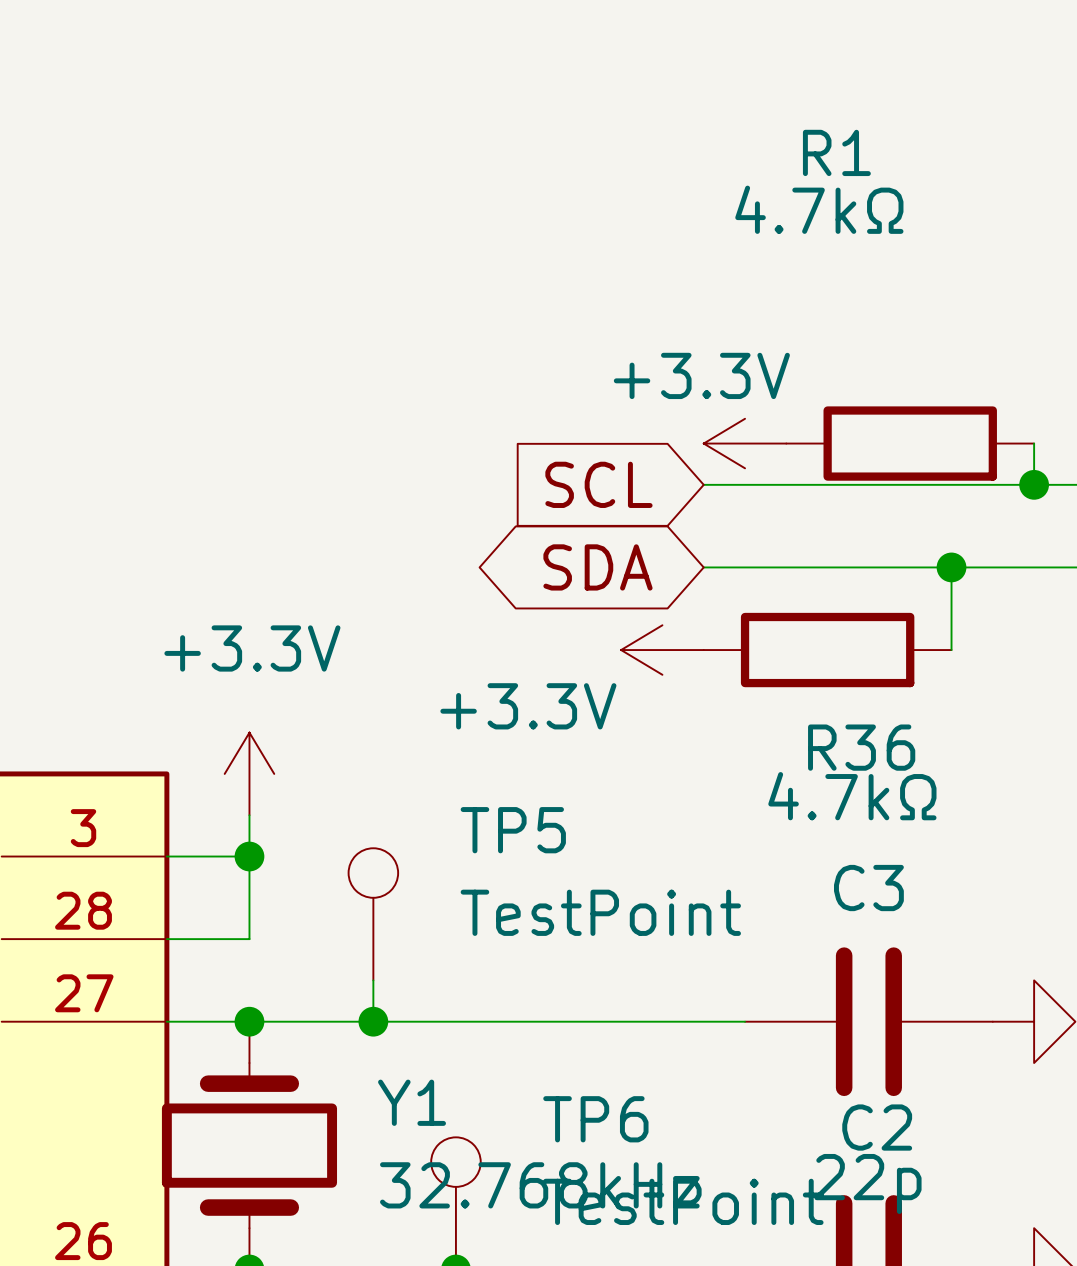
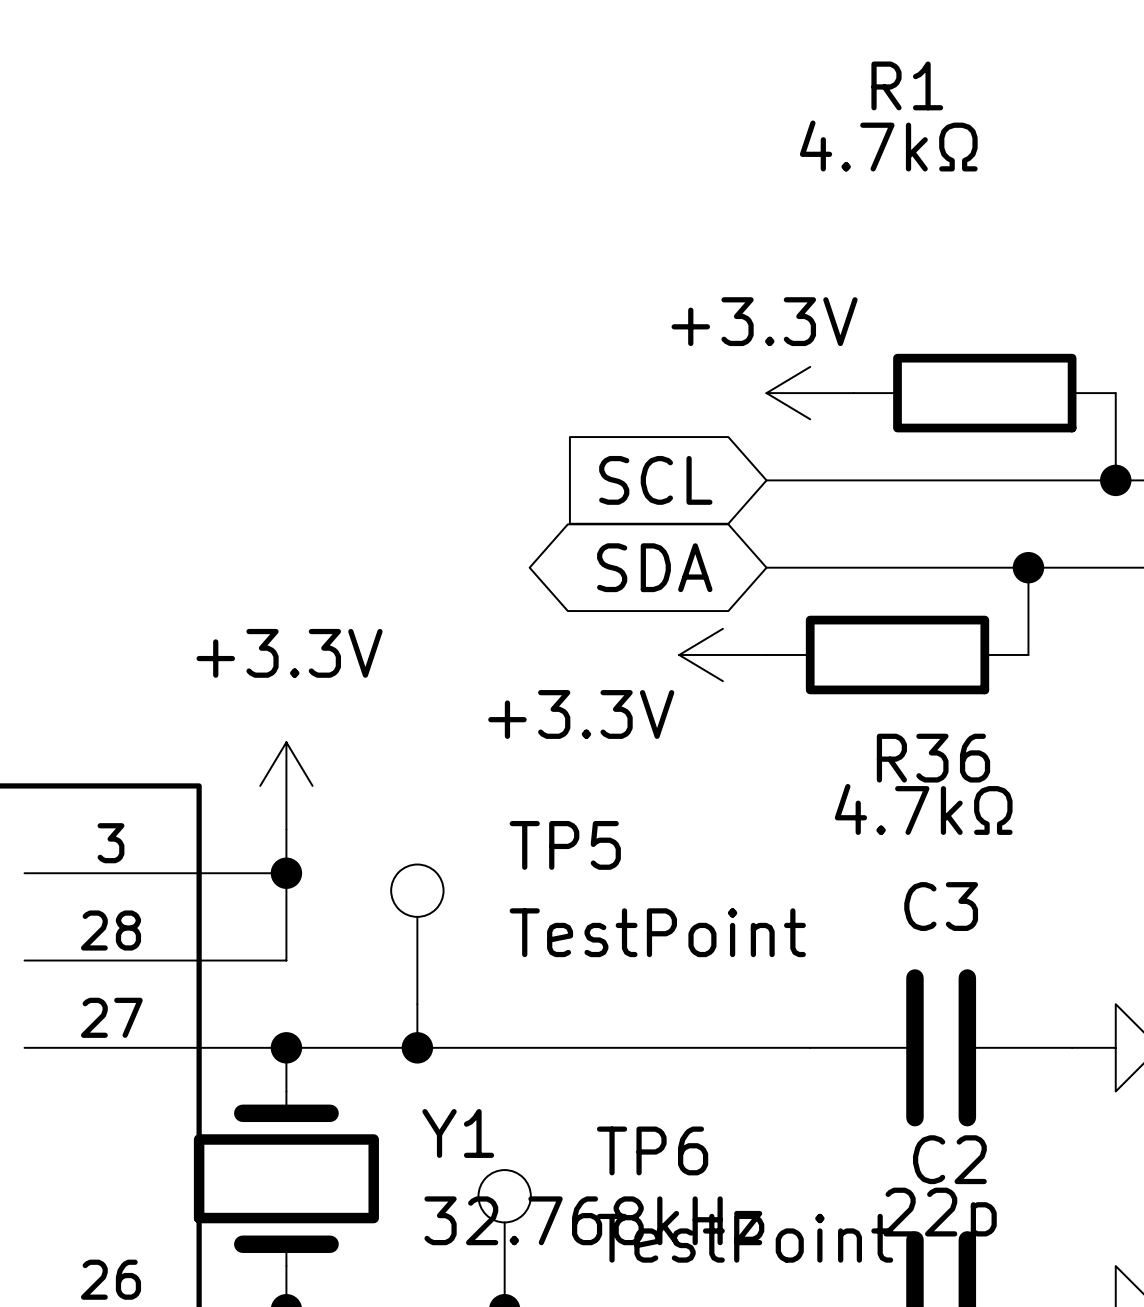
wire: none -> (1115, 393) (1115, 436)
power symbol position: +3.3V (745, 443) -> +3.3V (810, 393)
R1 position: (910, 443) -> (984, 393)

